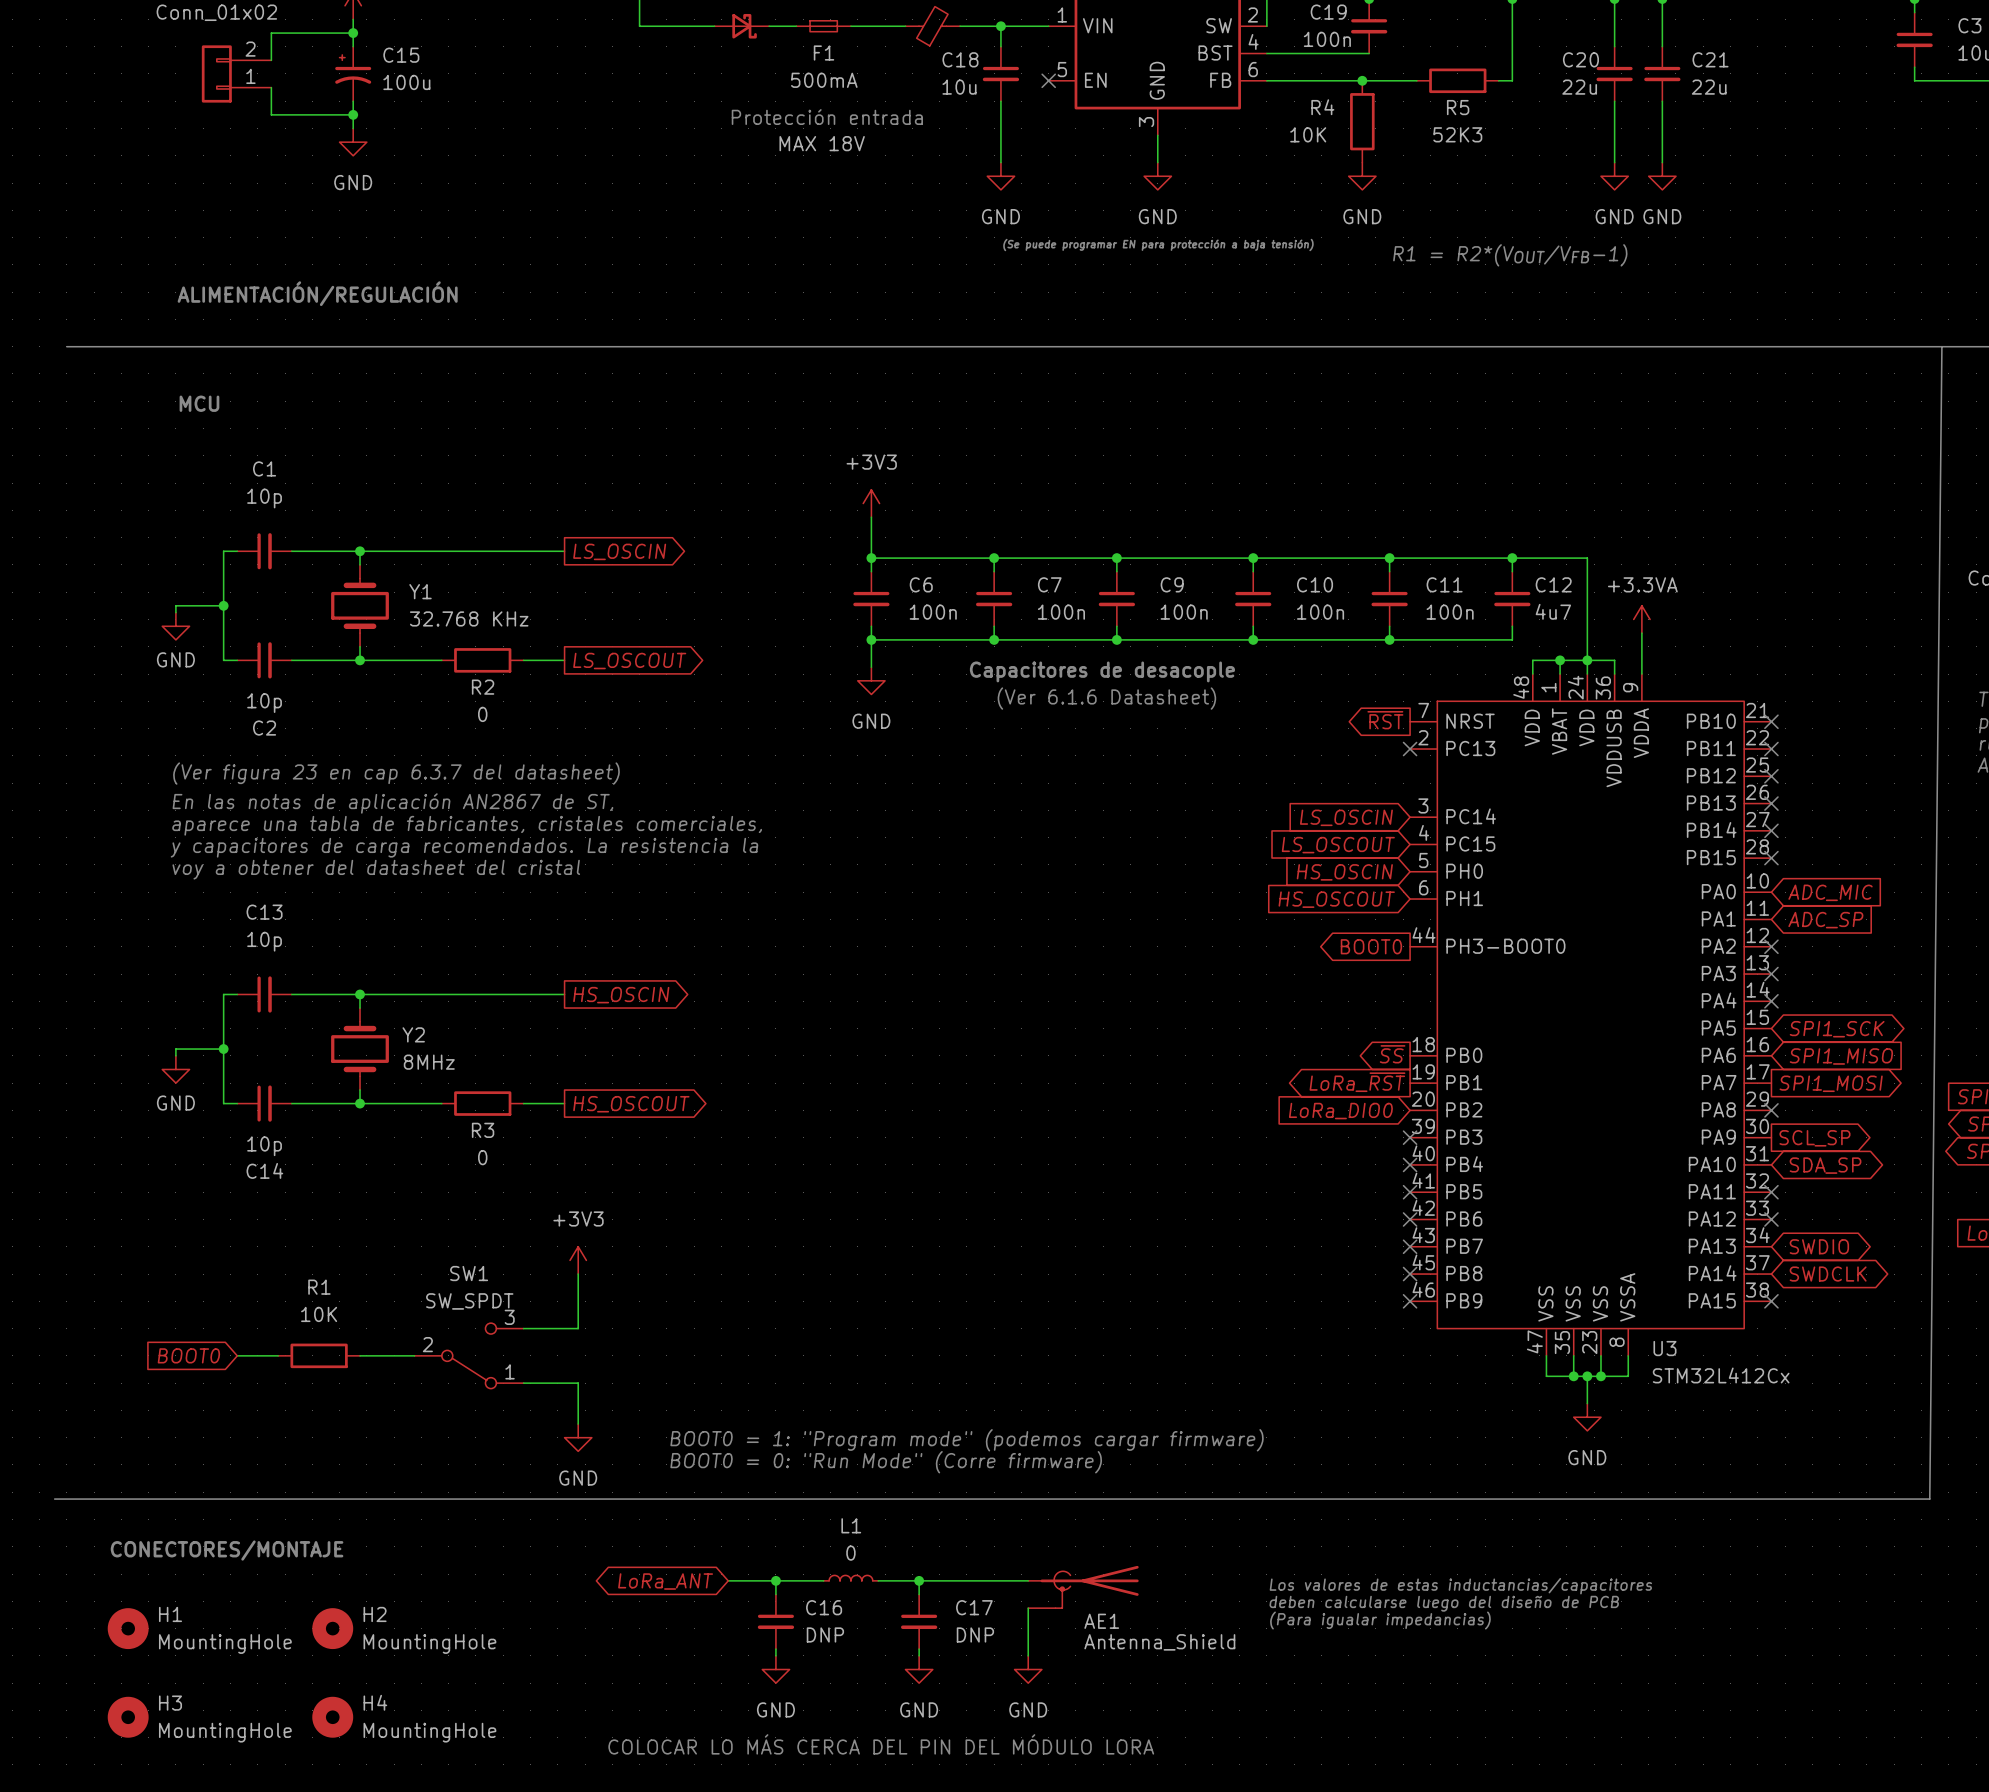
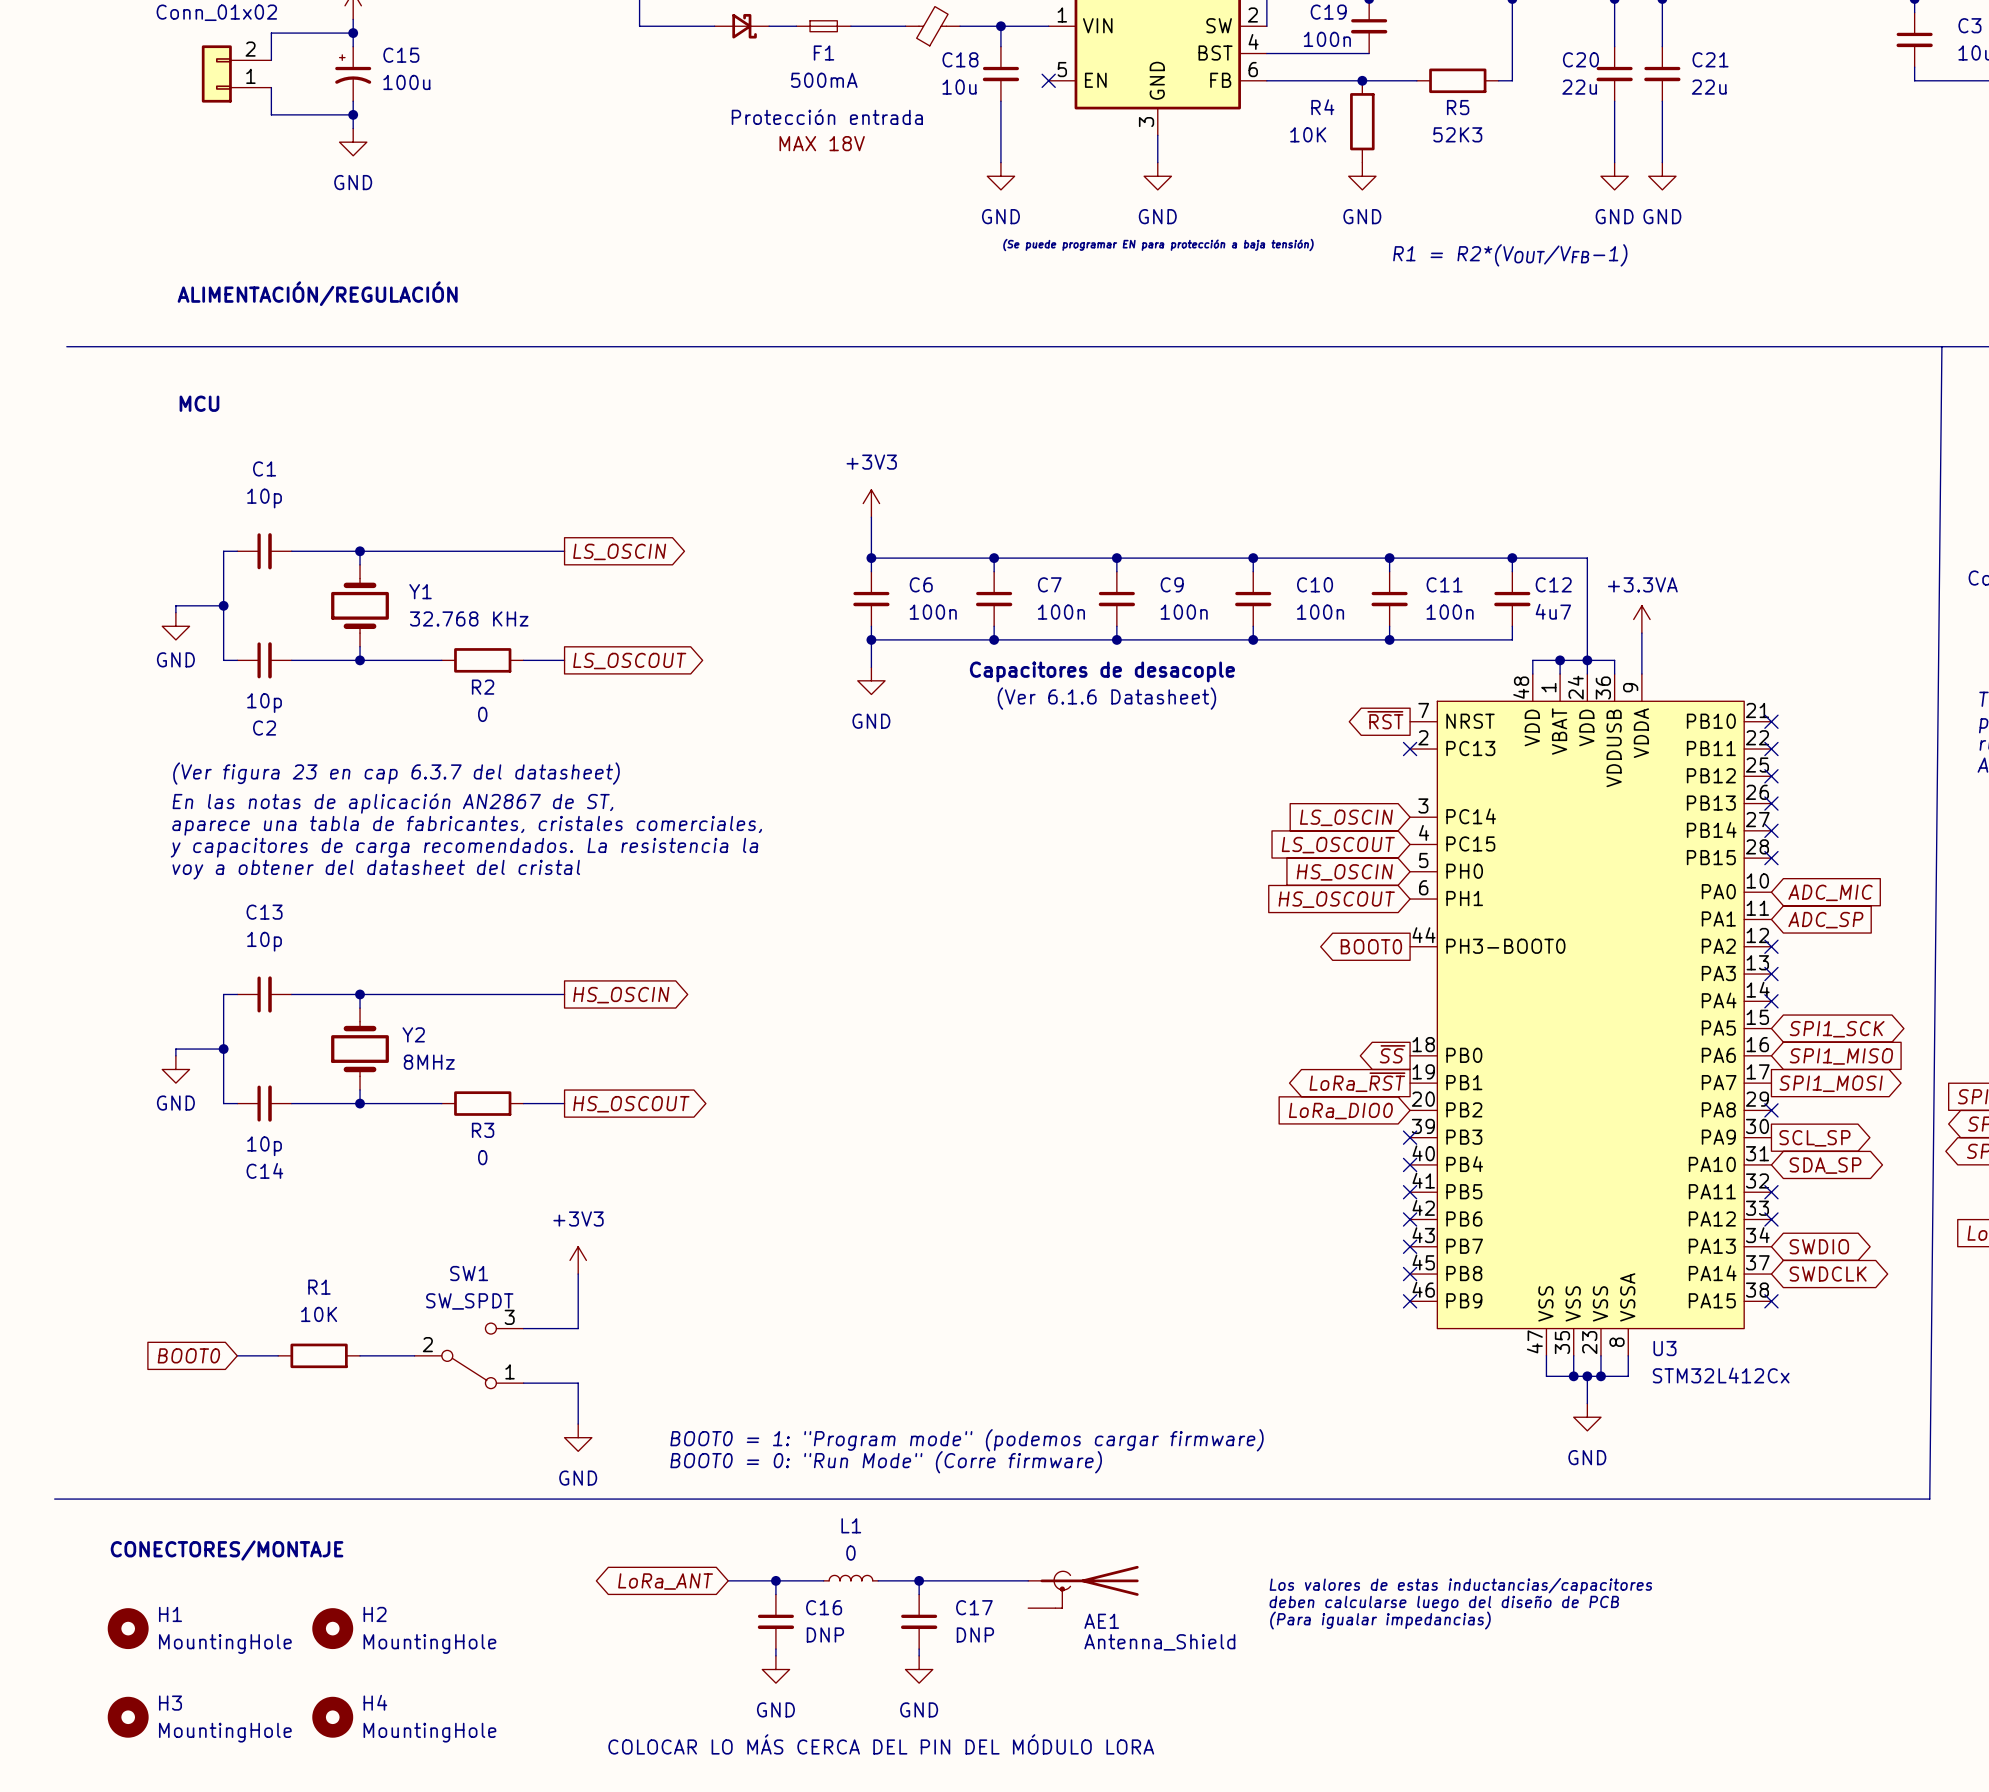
wire: (1028, 1608) (1028, 1655) -> none
power symbol: GND (1028, 1669) -> none

